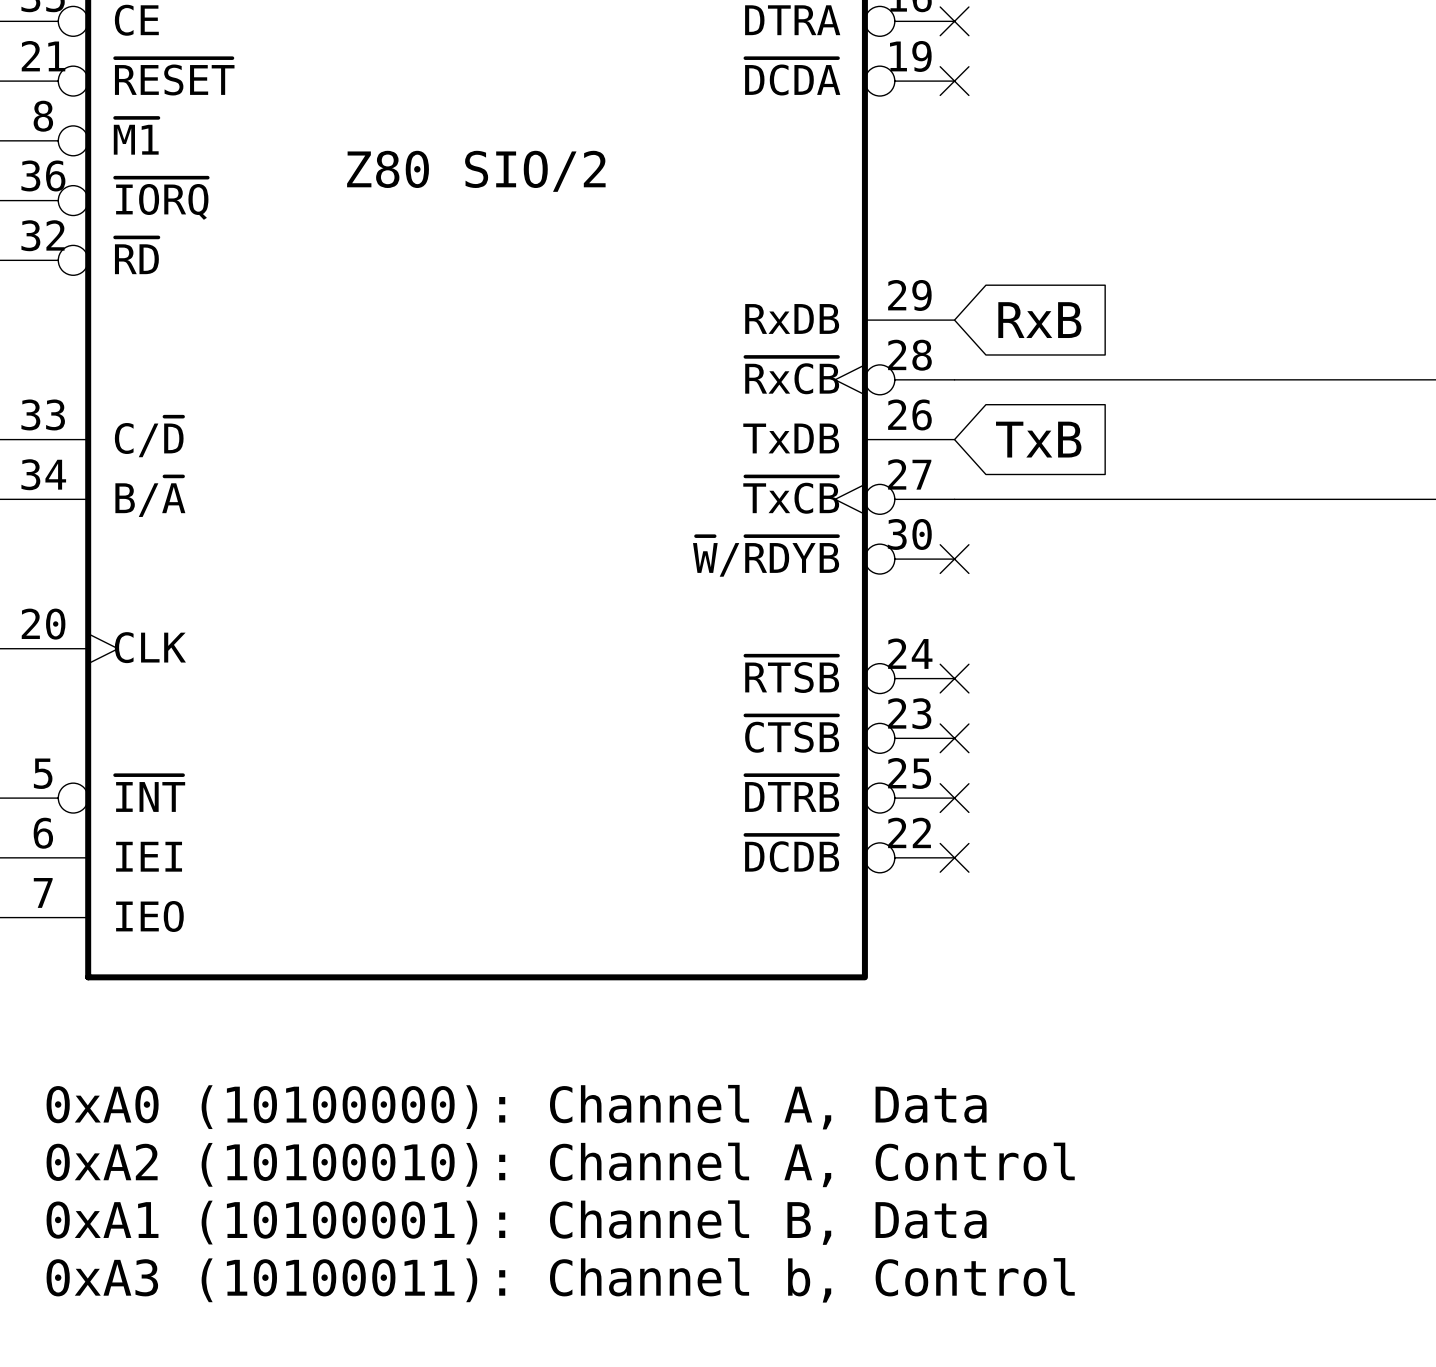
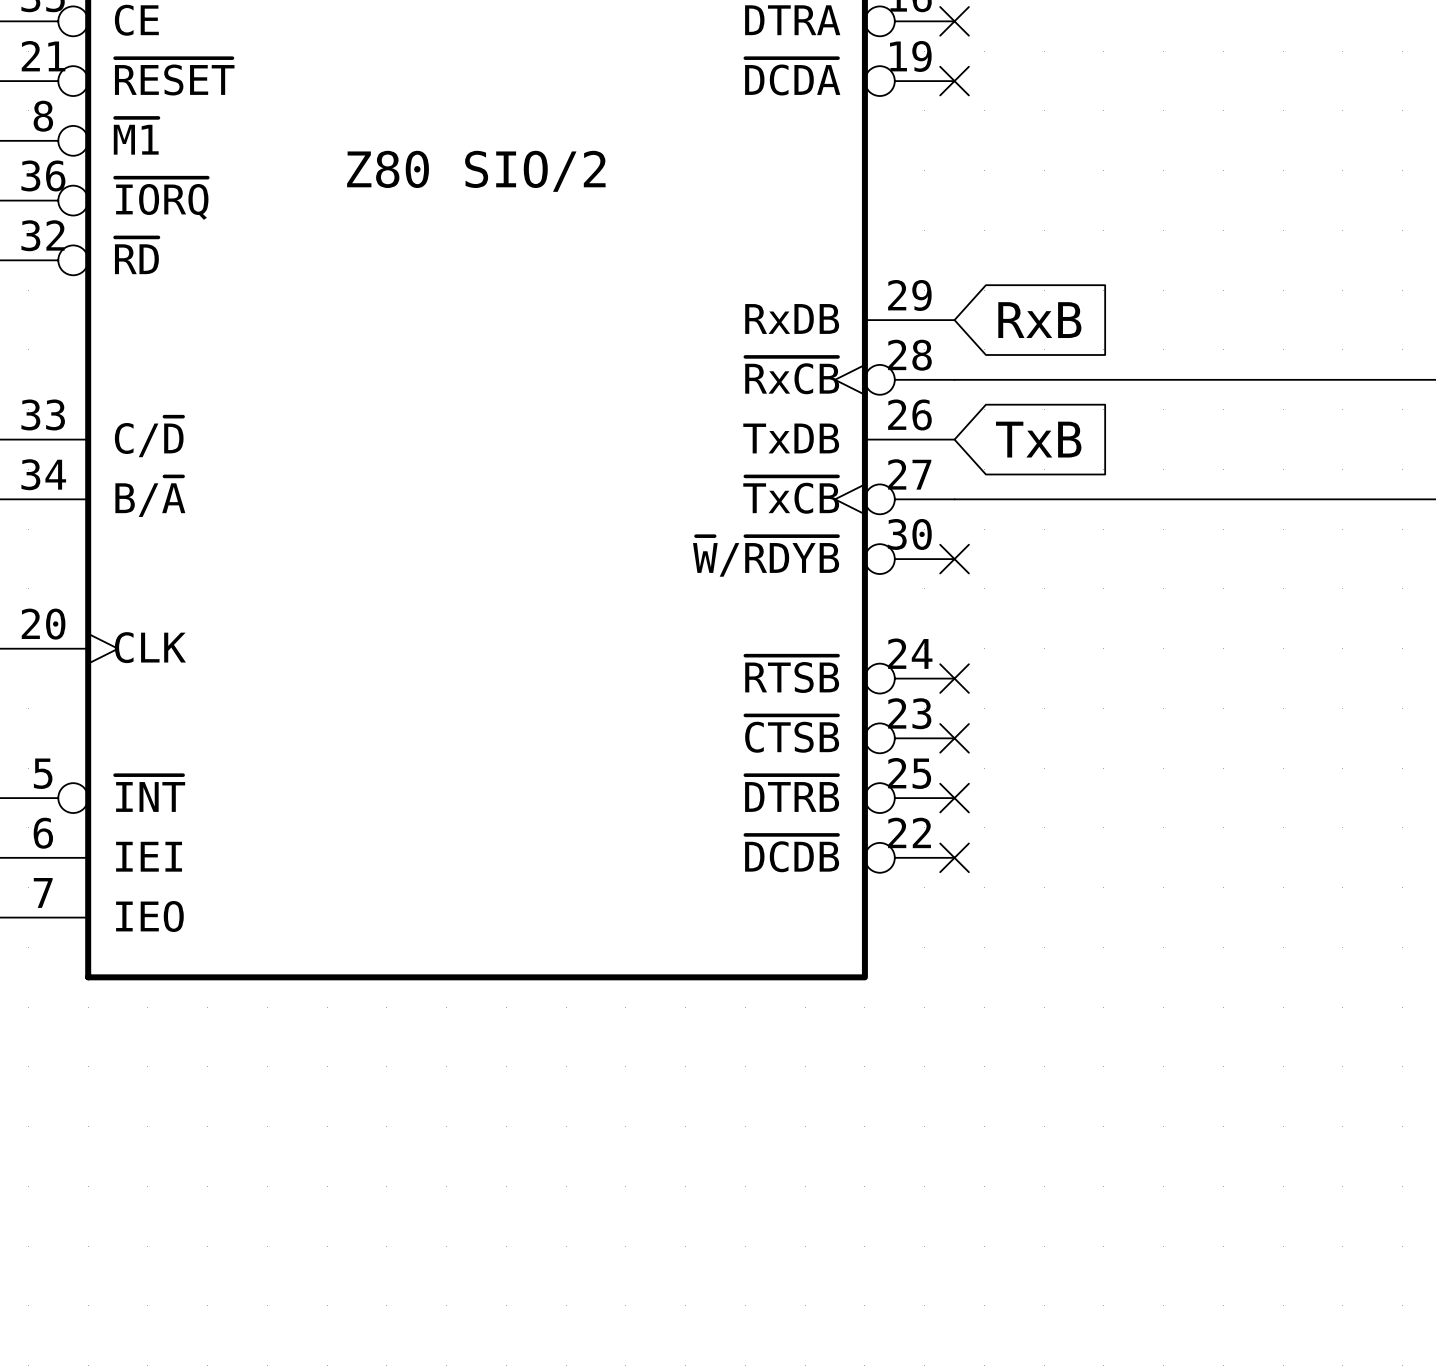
text: 0xA0 (10100000): Channel A, Data (516, 1107) -> none
text: 0xA2 (10100010): Channel A, Control (560, 1164) -> none
text: 0xA1 (10100001): Channel B, Data (516, 1222) -> none
text: 0xA3 (10100011): Channel b, Control (560, 1280) -> none

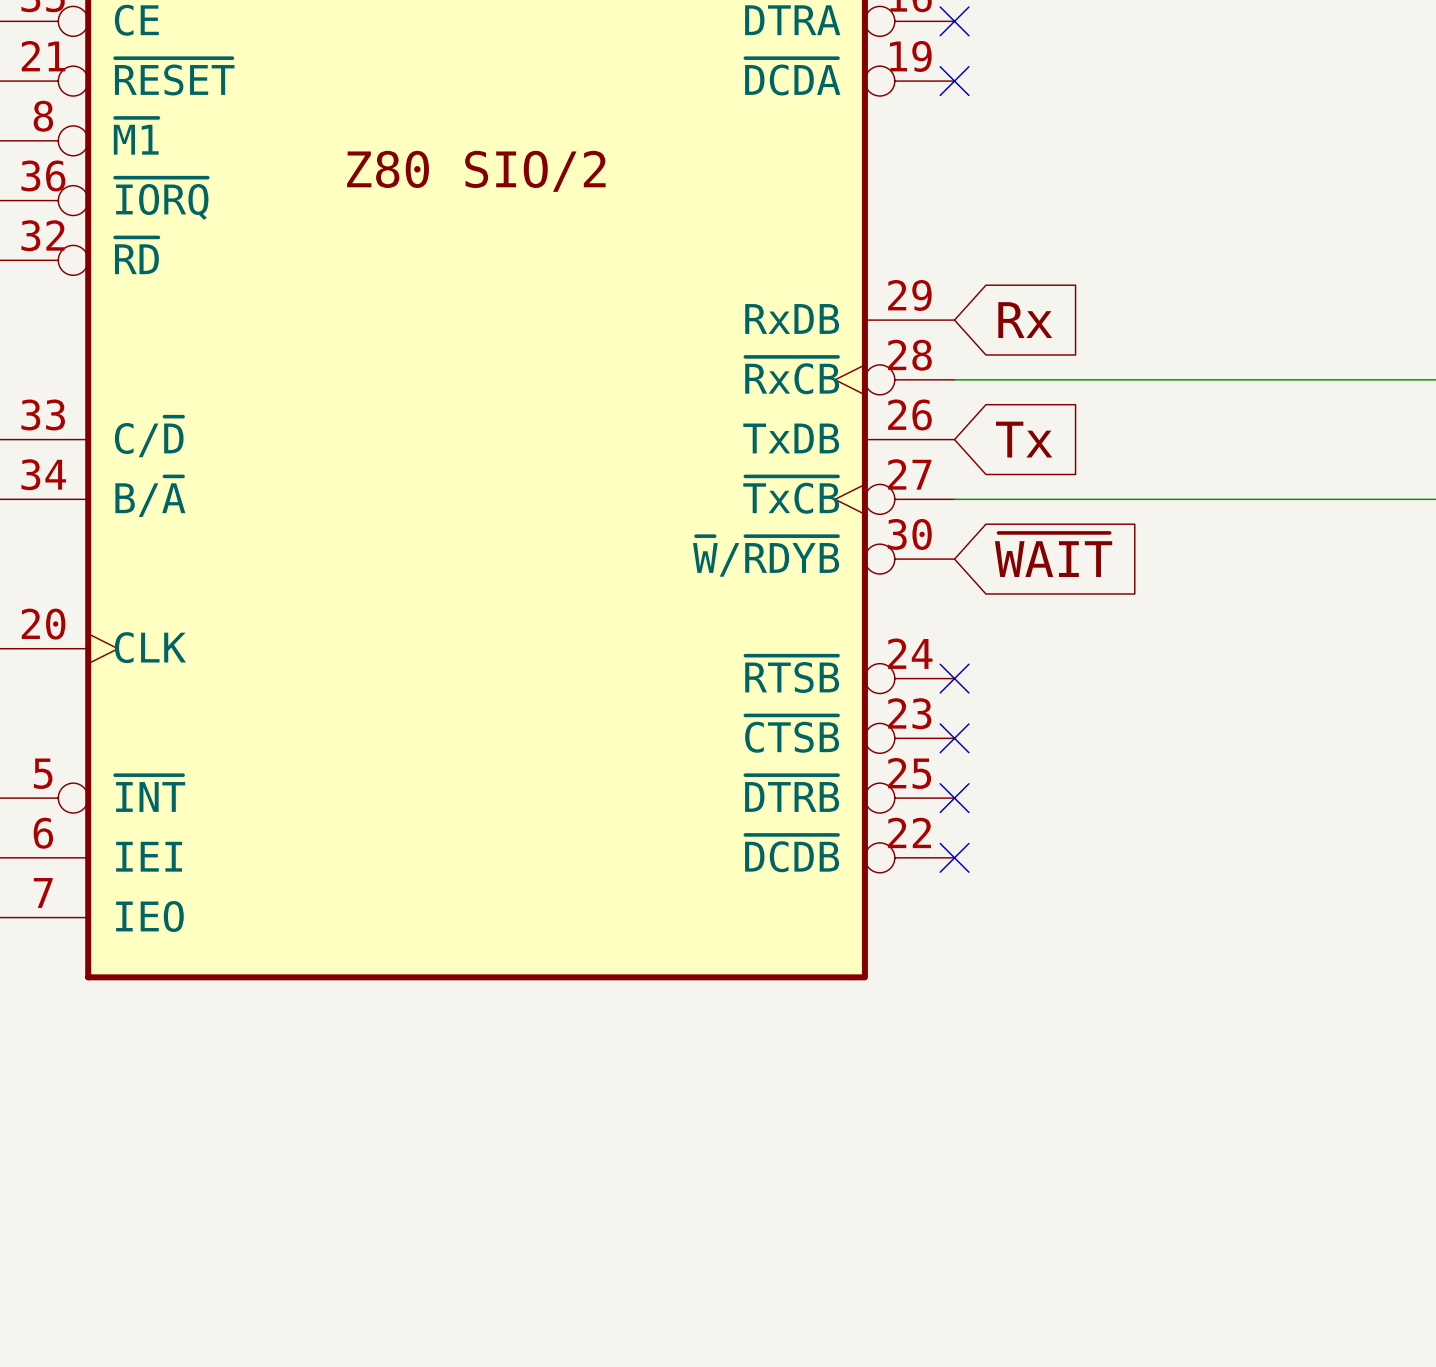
global label: RxB (1039, 320) -> Rx (1025, 320)
global label: TxB (1038, 439) -> Tx (1024, 439)
global label: none -> ~{WAIT} (1053, 554)
no-connect mark: (954, 559) -> none

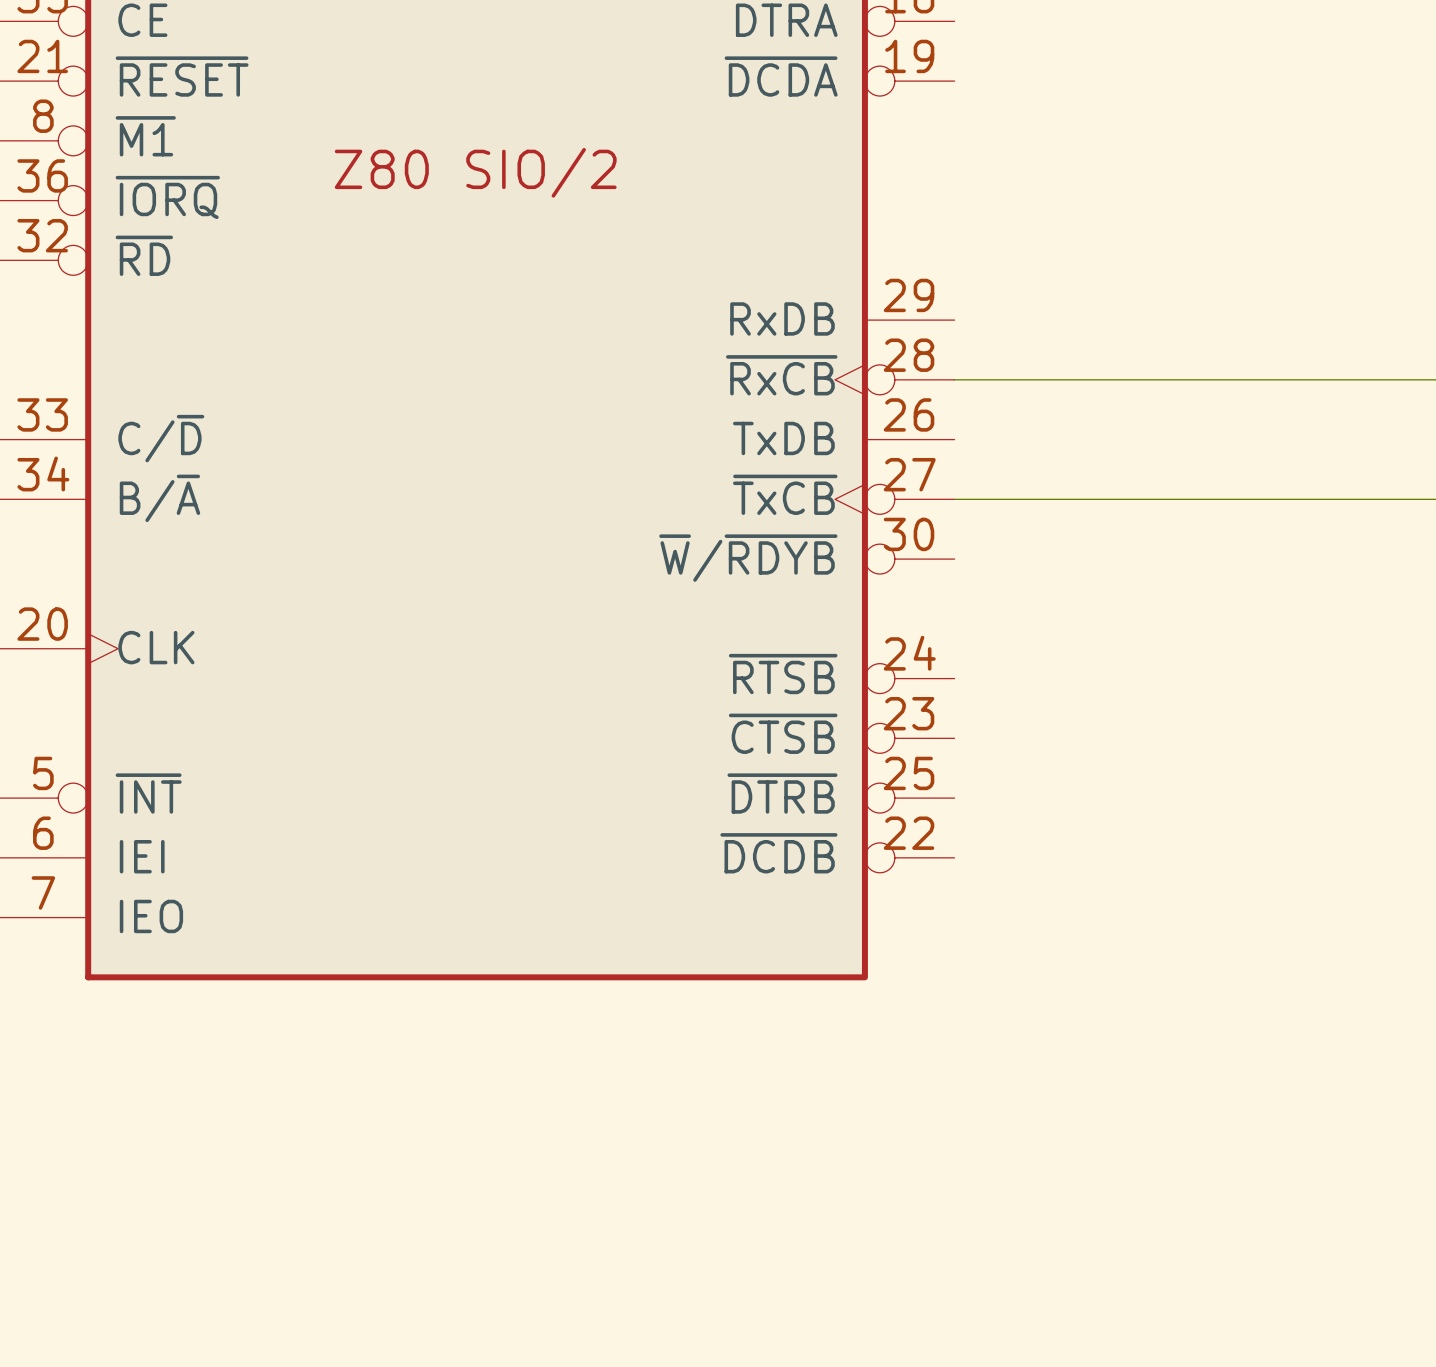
no-connect mark: (954, 21) -> none
no-connect mark: (954, 81) -> none
global label: Rx (1025, 320) -> none
global label: Tx (1024, 439) -> none
global label: ~{WAIT} (1053, 554) -> none
no-connect mark: (954, 678) -> none
no-connect mark: (954, 738) -> none
no-connect mark: (954, 798) -> none
no-connect mark: (954, 857) -> none

